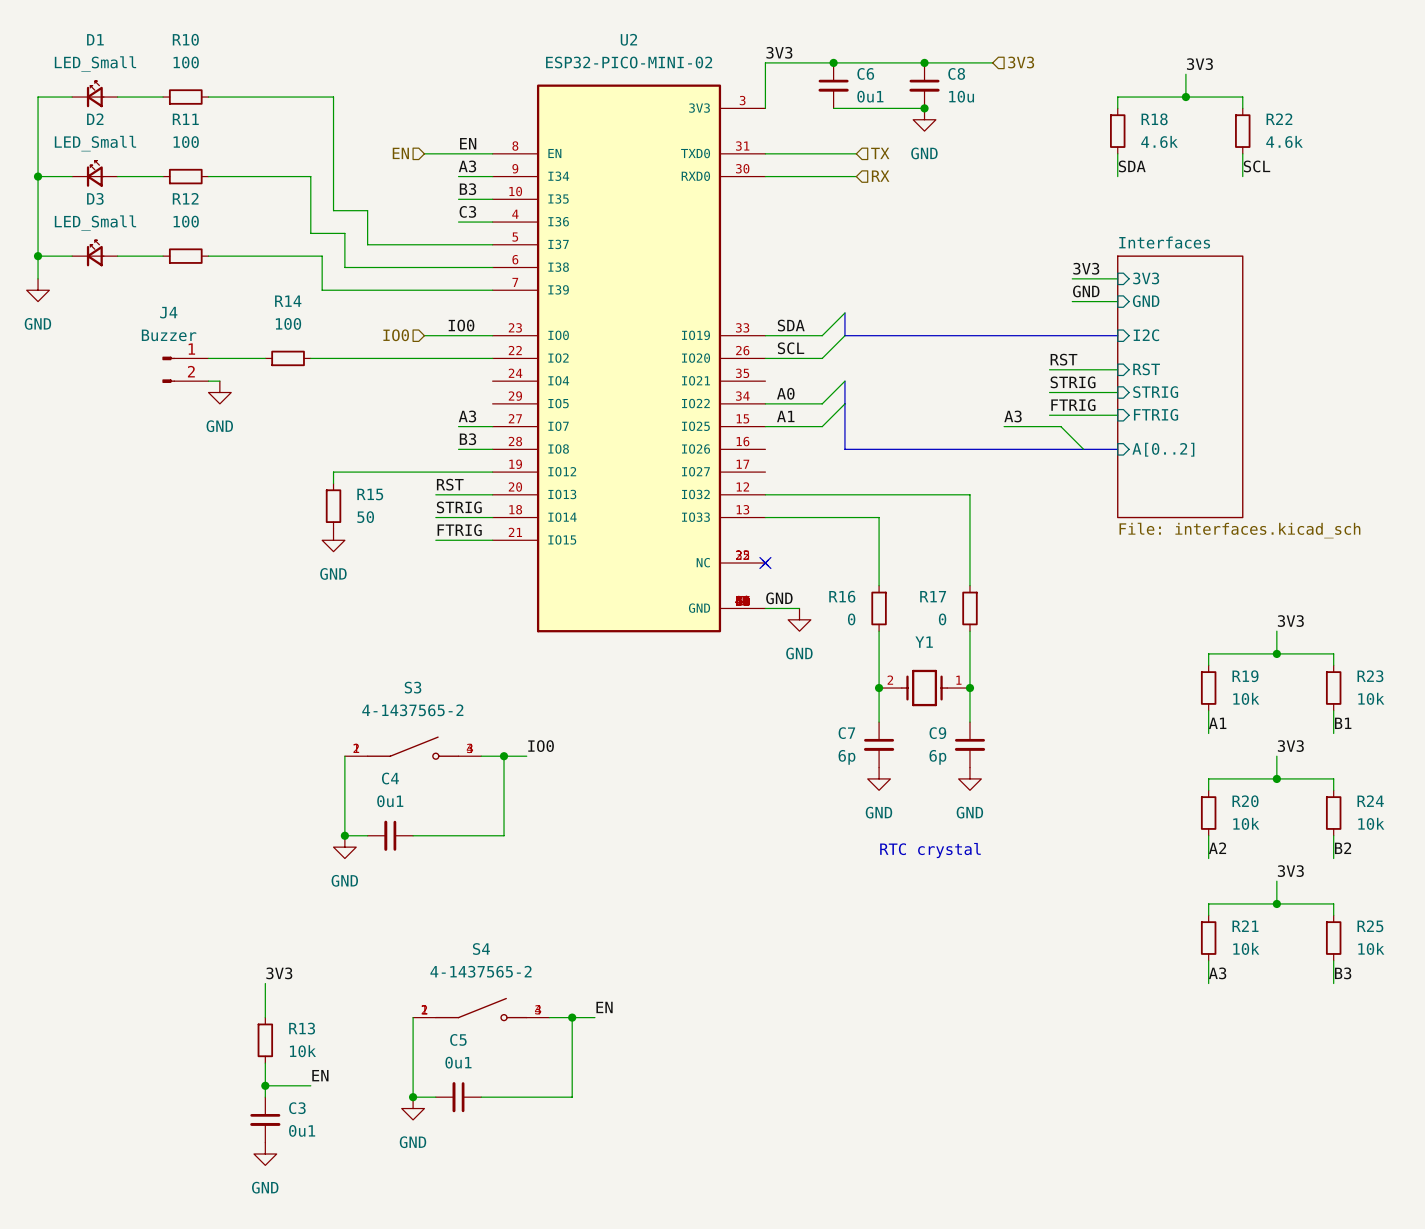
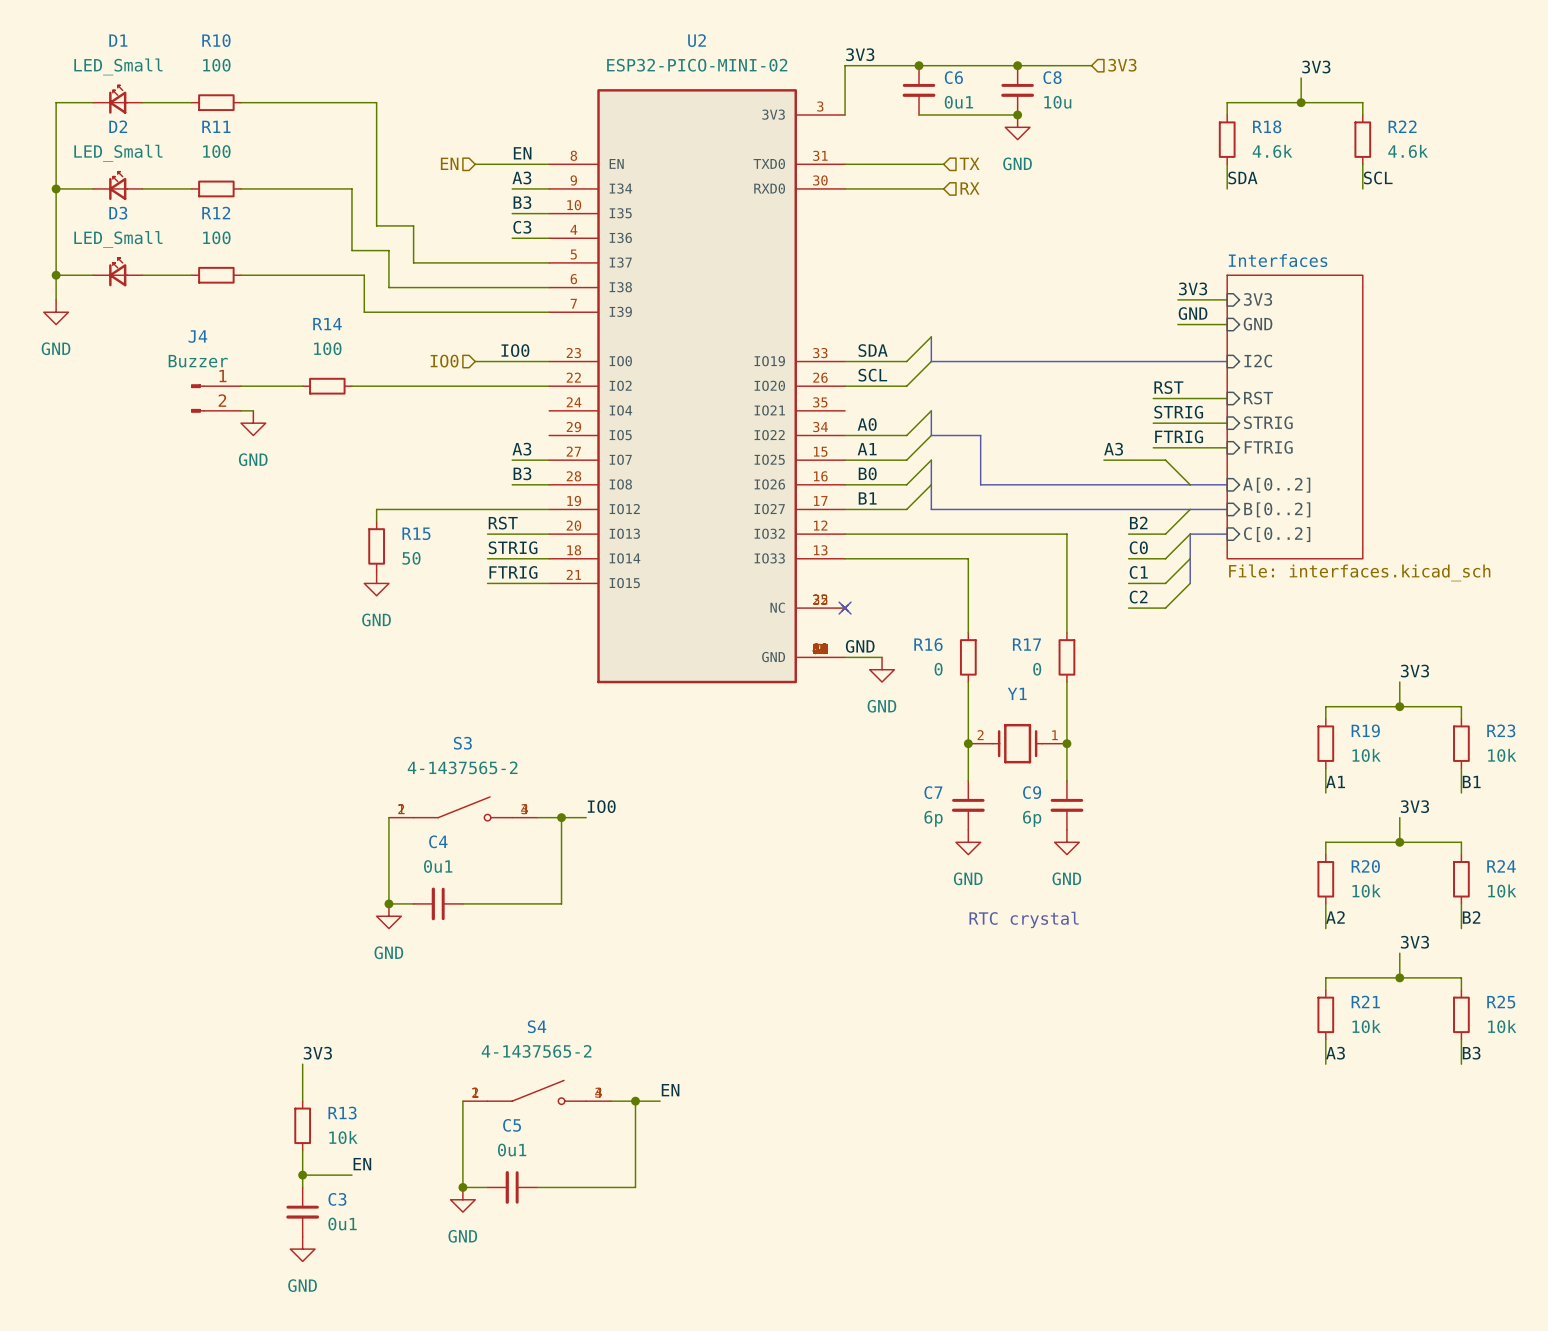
bus: (844, 403) (844, 426) -> none
wire: none -> (931, 460) (906, 484) (845, 484)
label: none -> B0 (867, 473)
wire: none -> (931, 484) (906, 509) (845, 509)
bus: (844, 449) (890, 449) -> (931, 435) (980, 435) (980, 484)
bus: none -> (931, 484) (931, 509) (1227, 509)
label: none -> B1 (867, 498)
wire: none -> (1190, 509) (1165, 534) (1128, 534)
sheet pin: none -> B[0..2] (1277, 509)
label: none -> B2 (1138, 523)
wire: none -> (1190, 534) (1165, 558) (1128, 558)
bus: none -> (1227, 534) (1190, 534) (1190, 583)
sheet pin: none -> C[0..2] (1277, 534)
label: none -> C0 (1138, 547)
wire: none -> (1190, 558) (1165, 583) (1128, 583)
label: none -> C1 (1138, 572)
wire: none -> (1190, 583) (1165, 608) (1128, 608)
label: none -> C2 (1138, 597)

